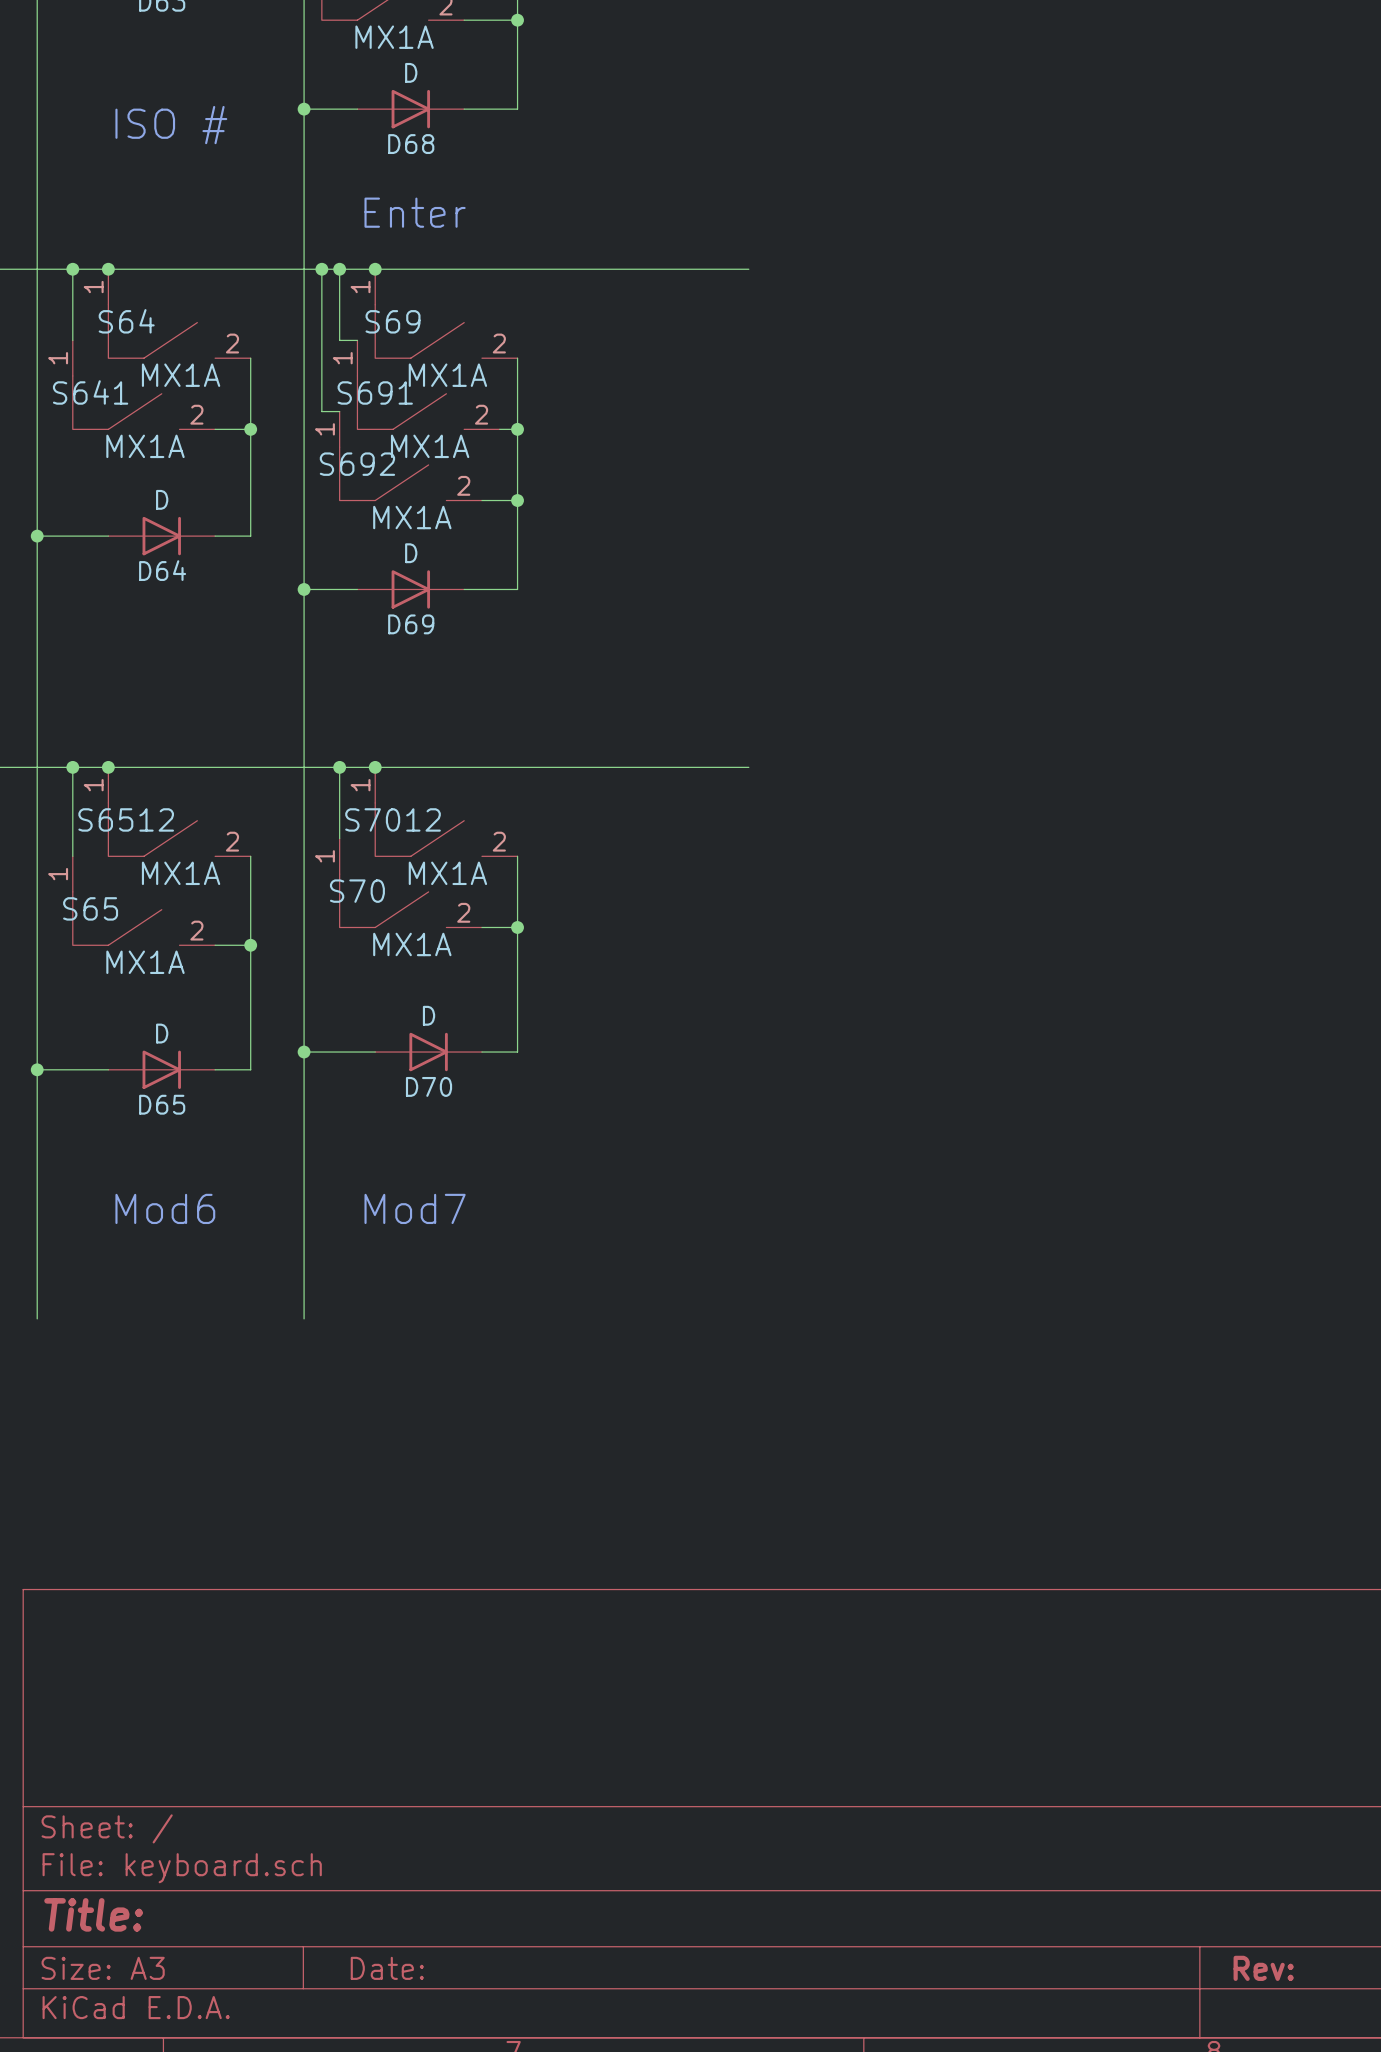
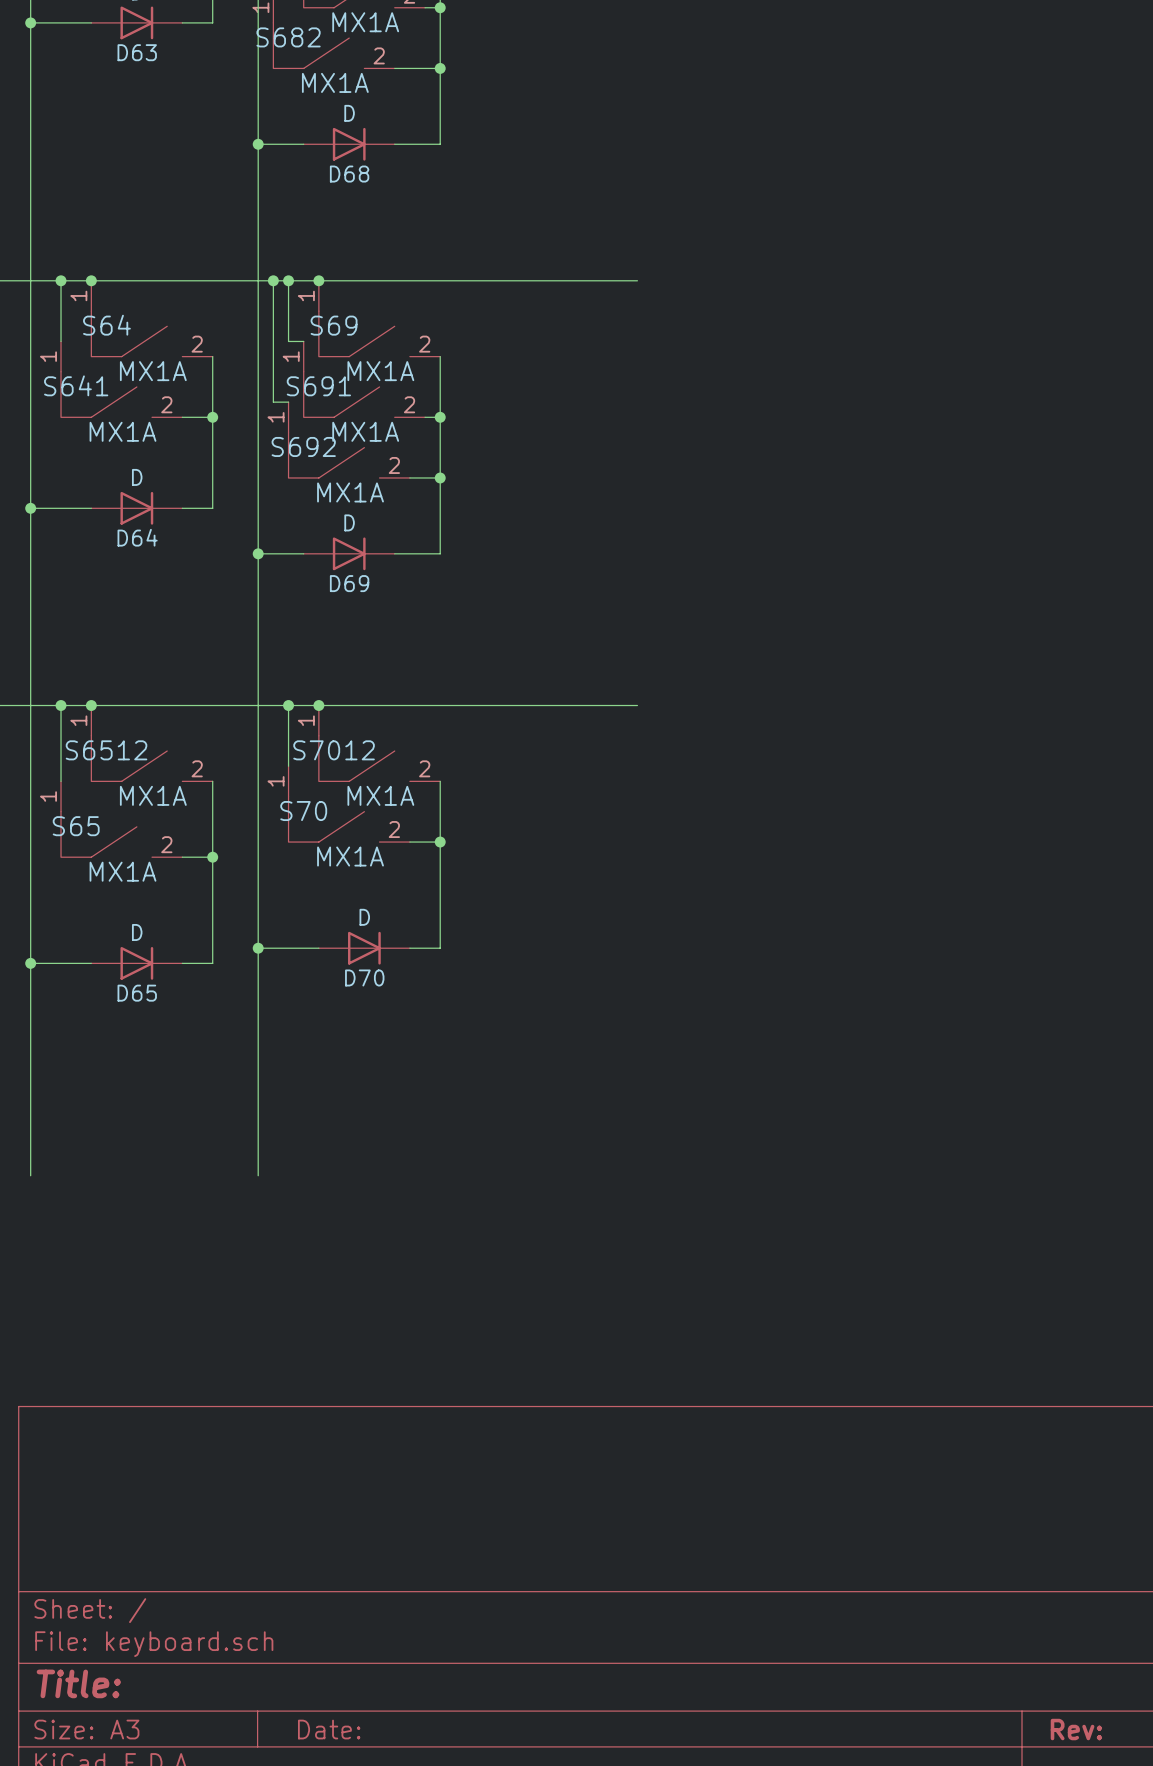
text: ISO # (171, 125) -> none
text: Enter (415, 212) -> none
text: Mod6 (165, 1208) -> none
text: Mod7 (415, 1208) -> none

